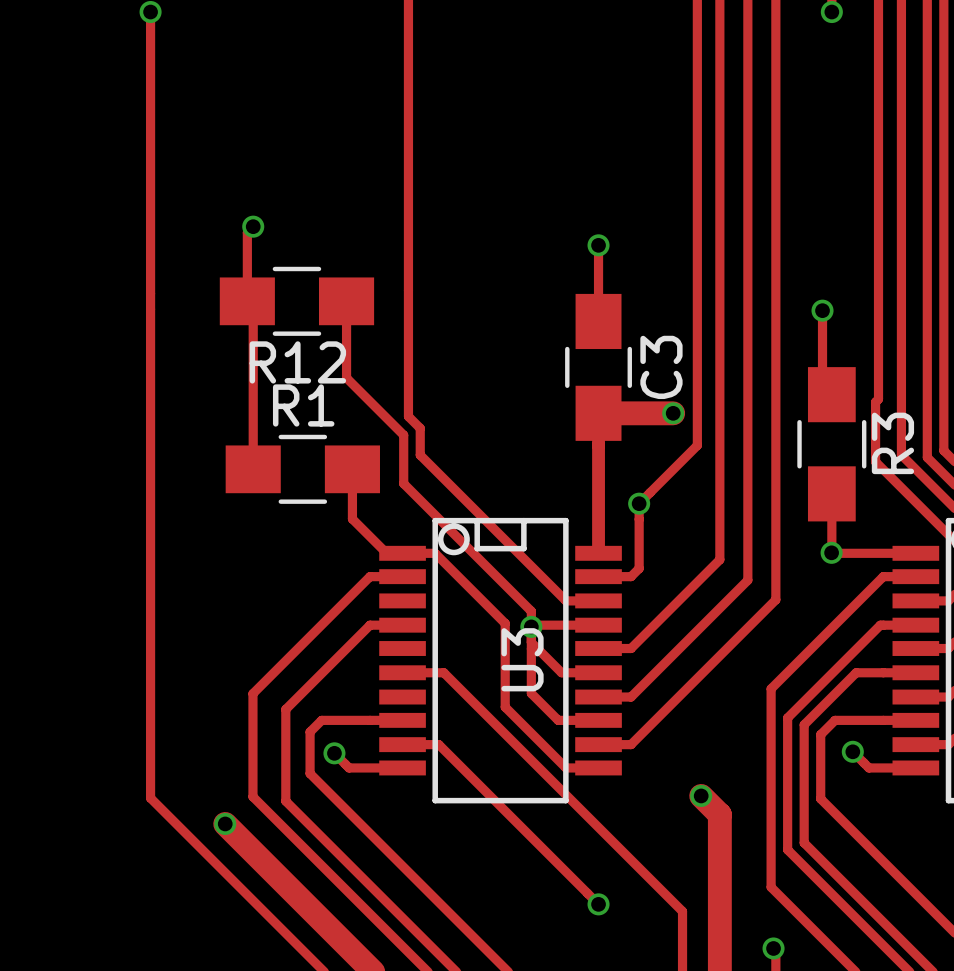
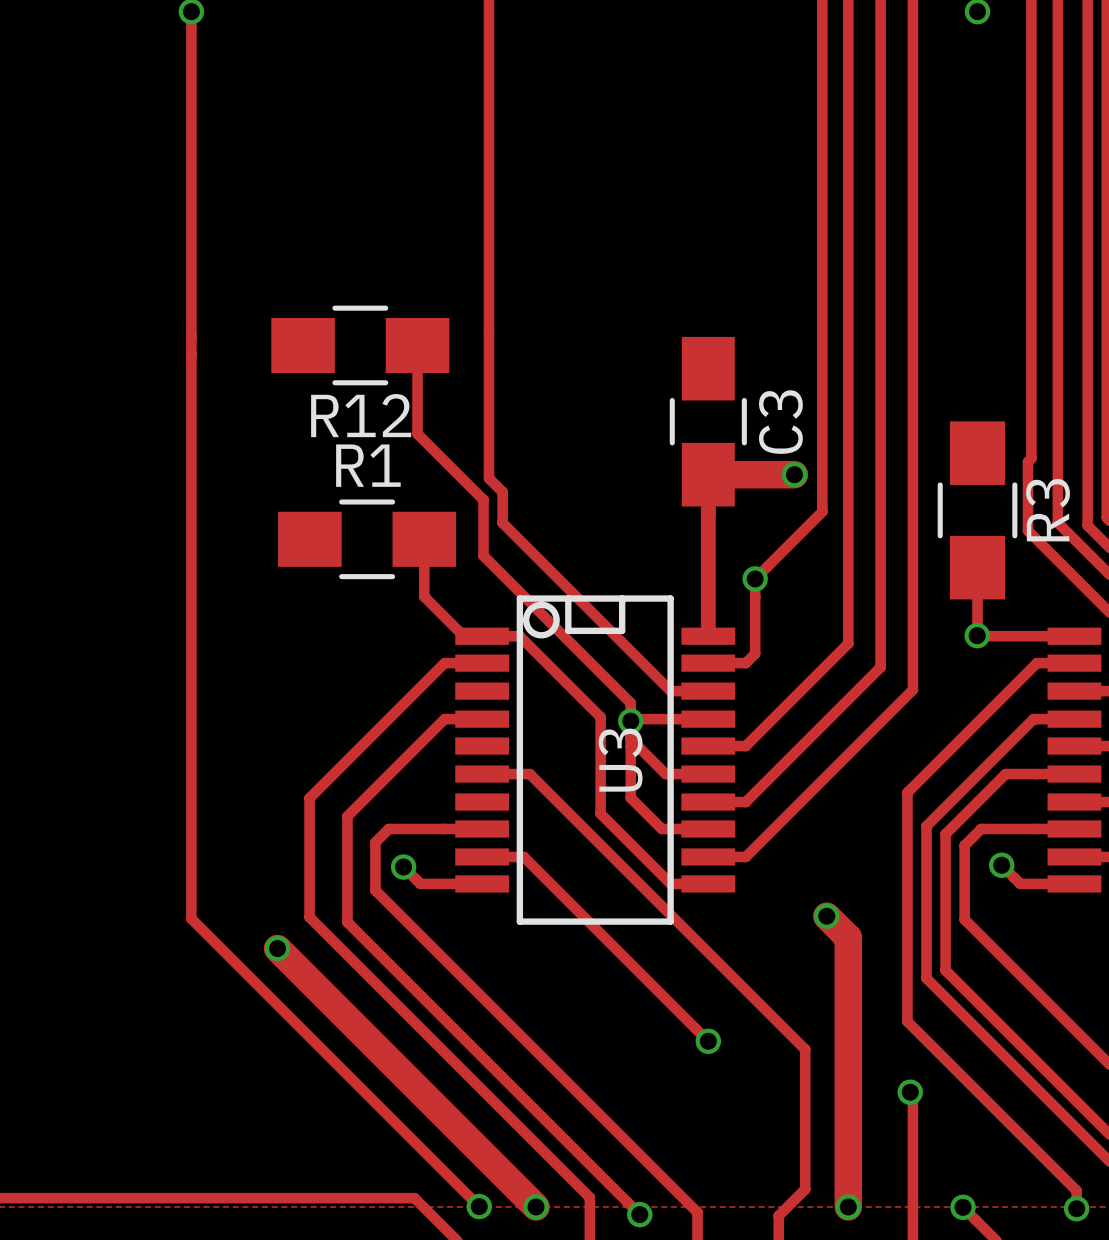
track: (253, 226) (247, 232) (247, 301) (253, 307) (253, 469) -> none
via: (253, 226) -> none
track: (598, 245) (598, 321) -> none
via: (598, 245) -> none
track: (822, 310) (822, 385) (831, 394) -> none
via: (822, 310) -> none

